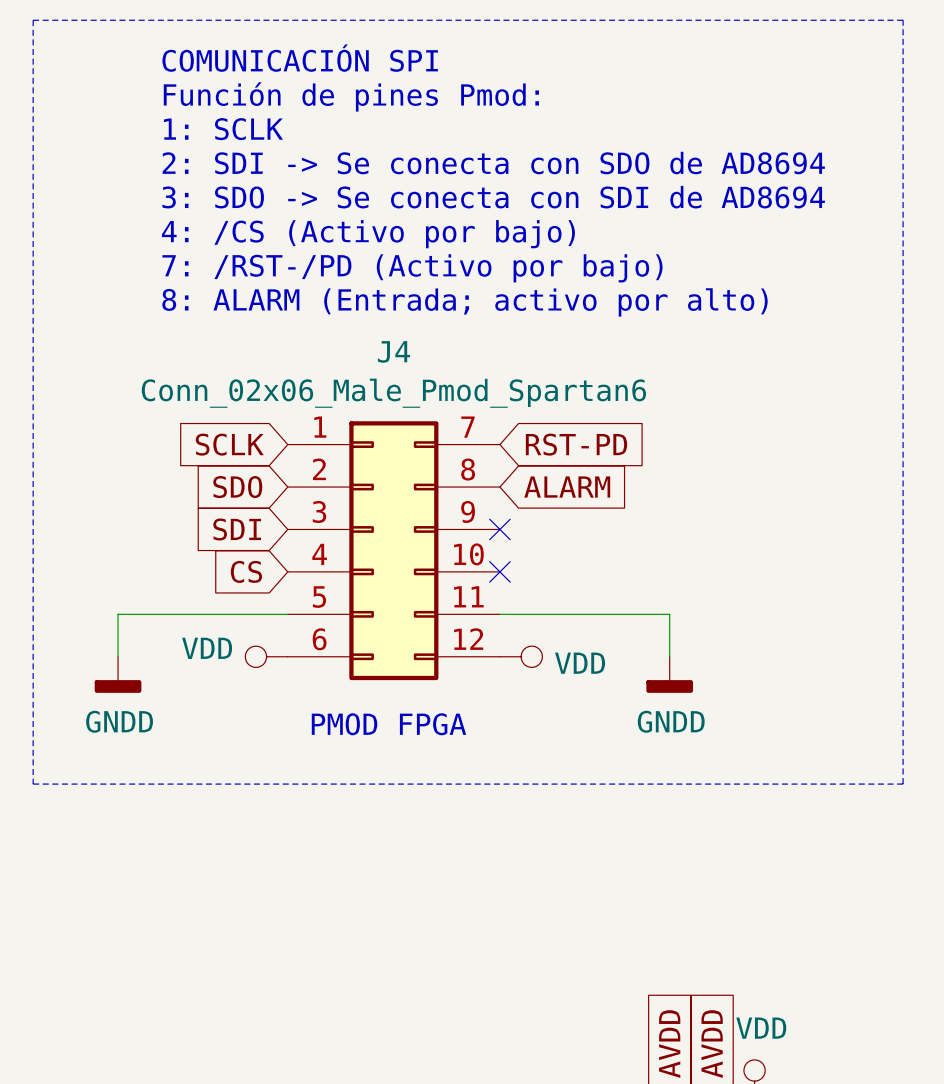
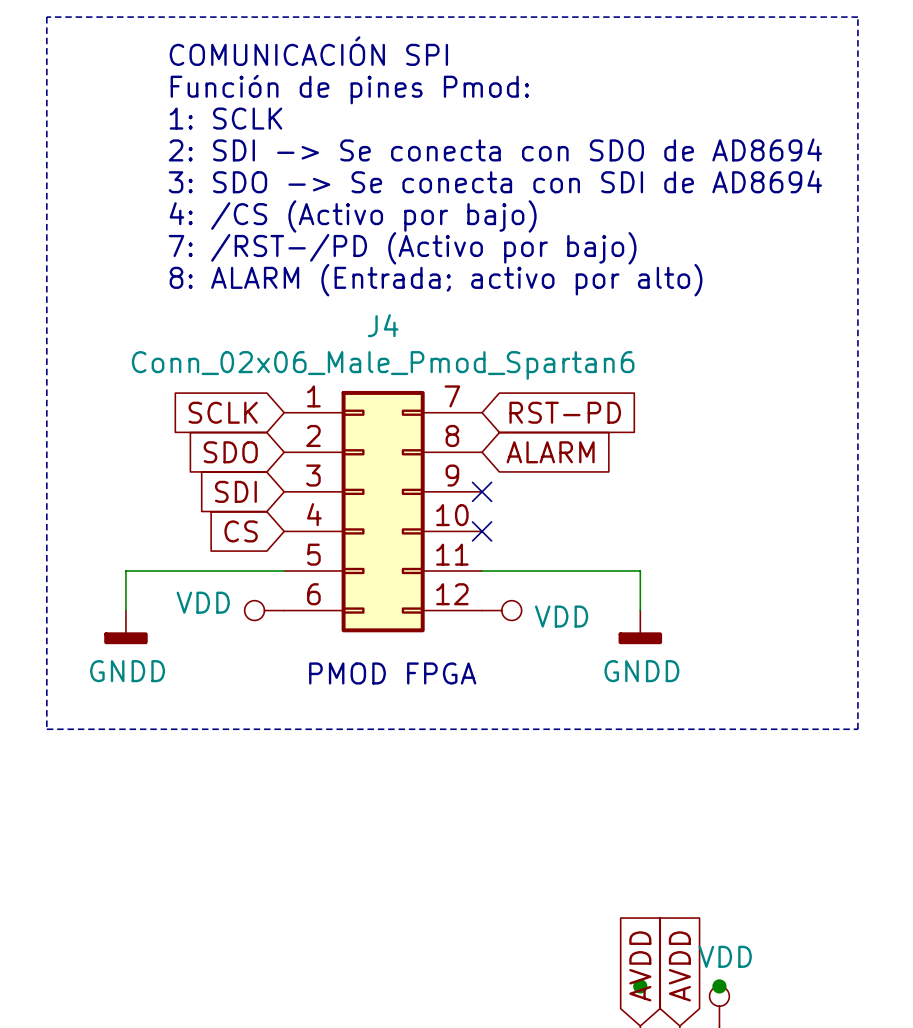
junction: none -> (640, 986)
junction: none -> (719, 986)

